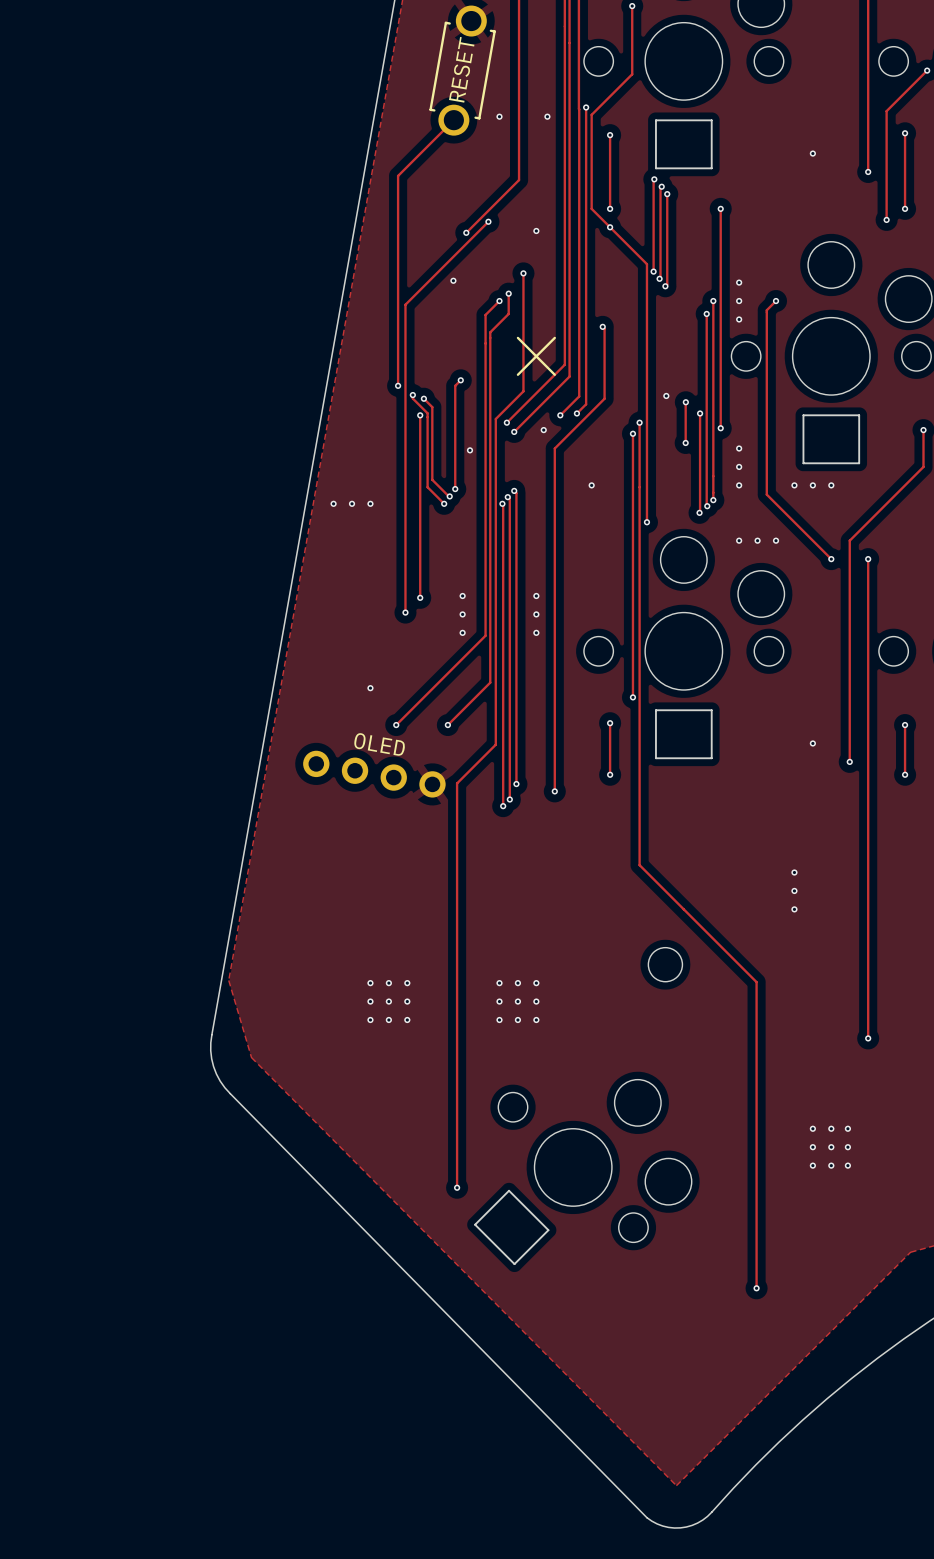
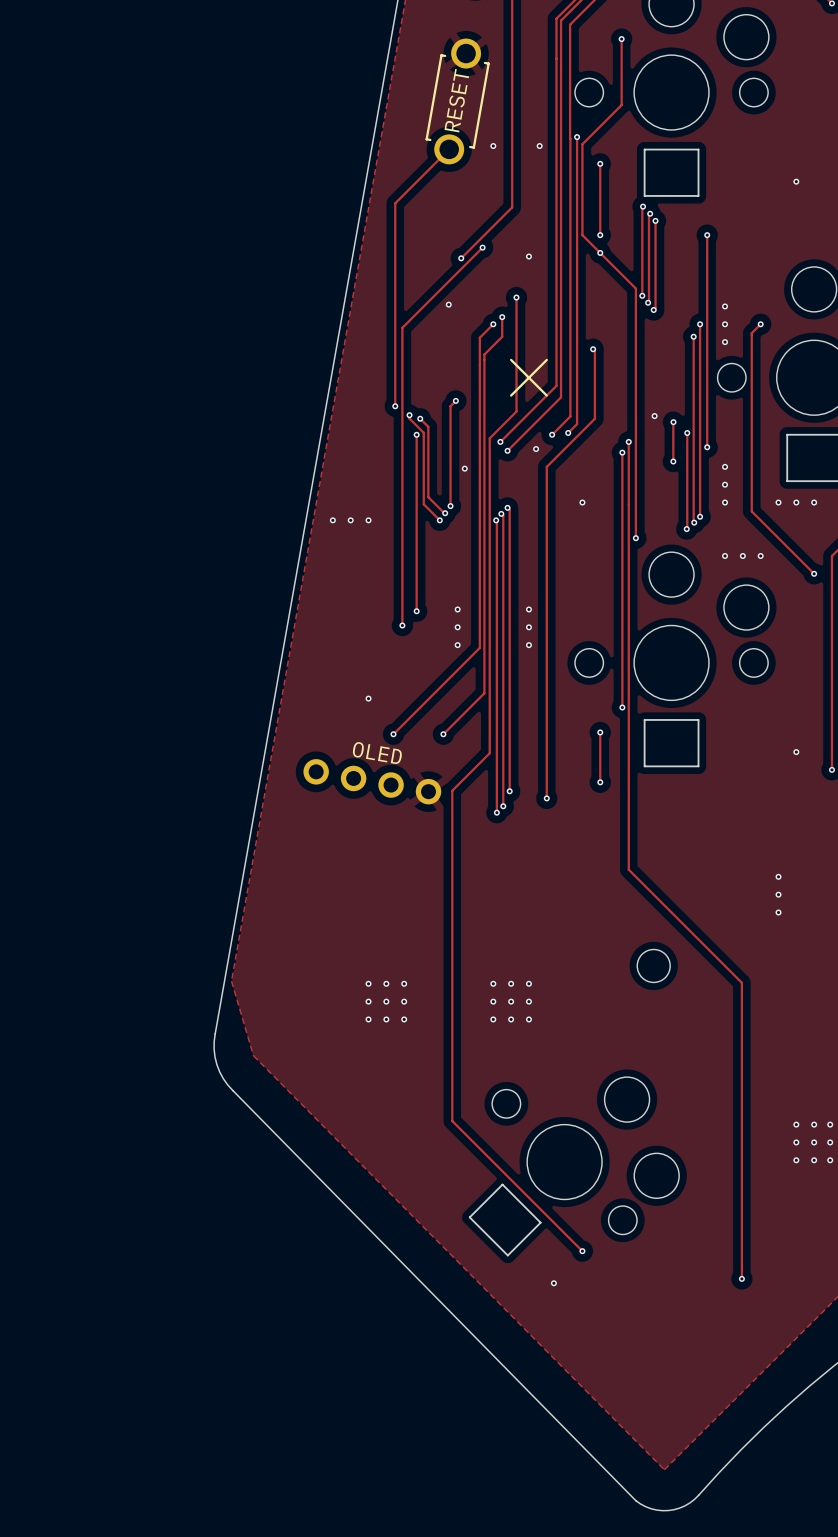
track: (457, 1125) (457, 1187) -> (452, 1121) (582, 1251)
via: (457, 1187) -> none
via: none -> (582, 1251)
via: none -> (553, 1283)

